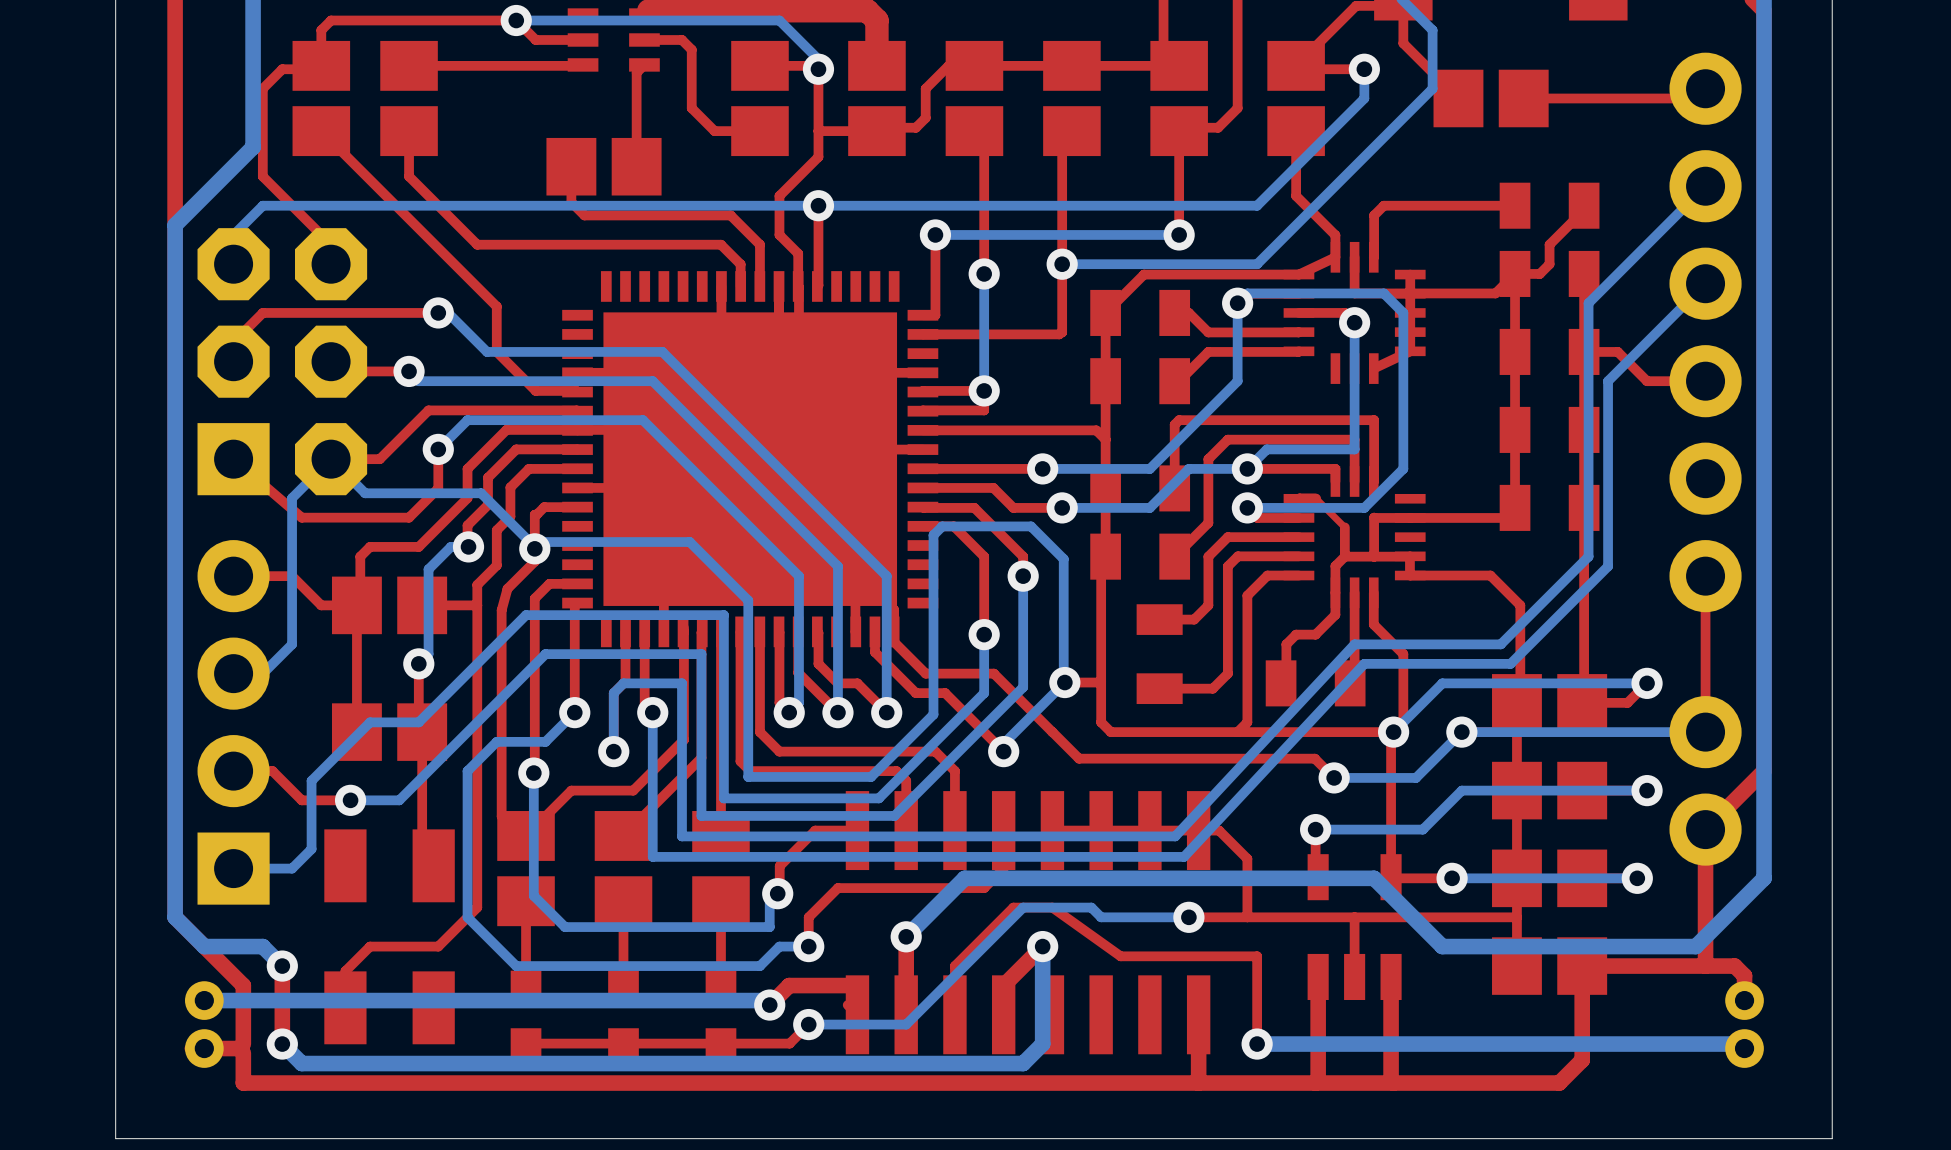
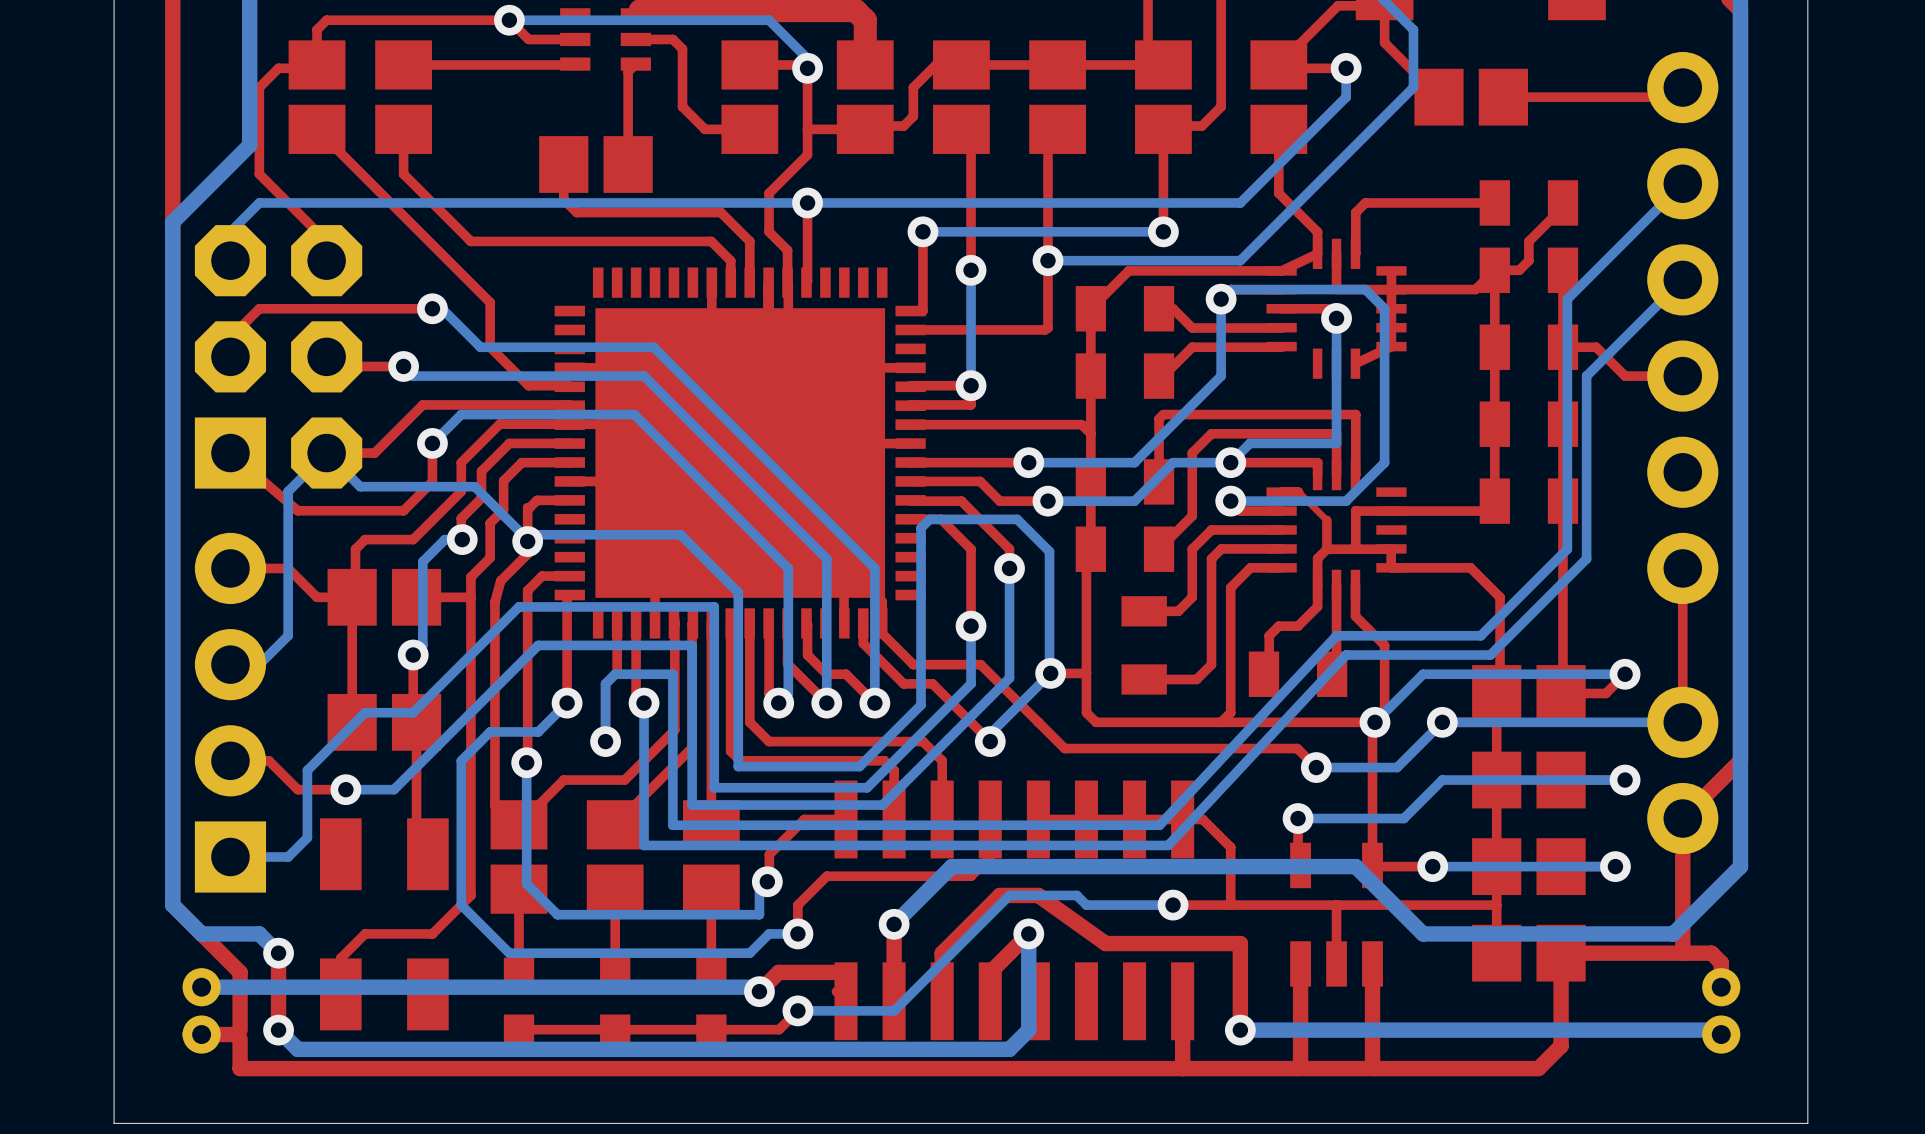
top track width: thin (954, 1014) (954, 966) (1013, 907) (1052, 907) (1120, 956) (1257, 956) (1257, 1044) -> thick (942, 1001) (942, 953) (999, 895) (1038, 895) (1105, 943) (1240, 943) (1240, 1030)

